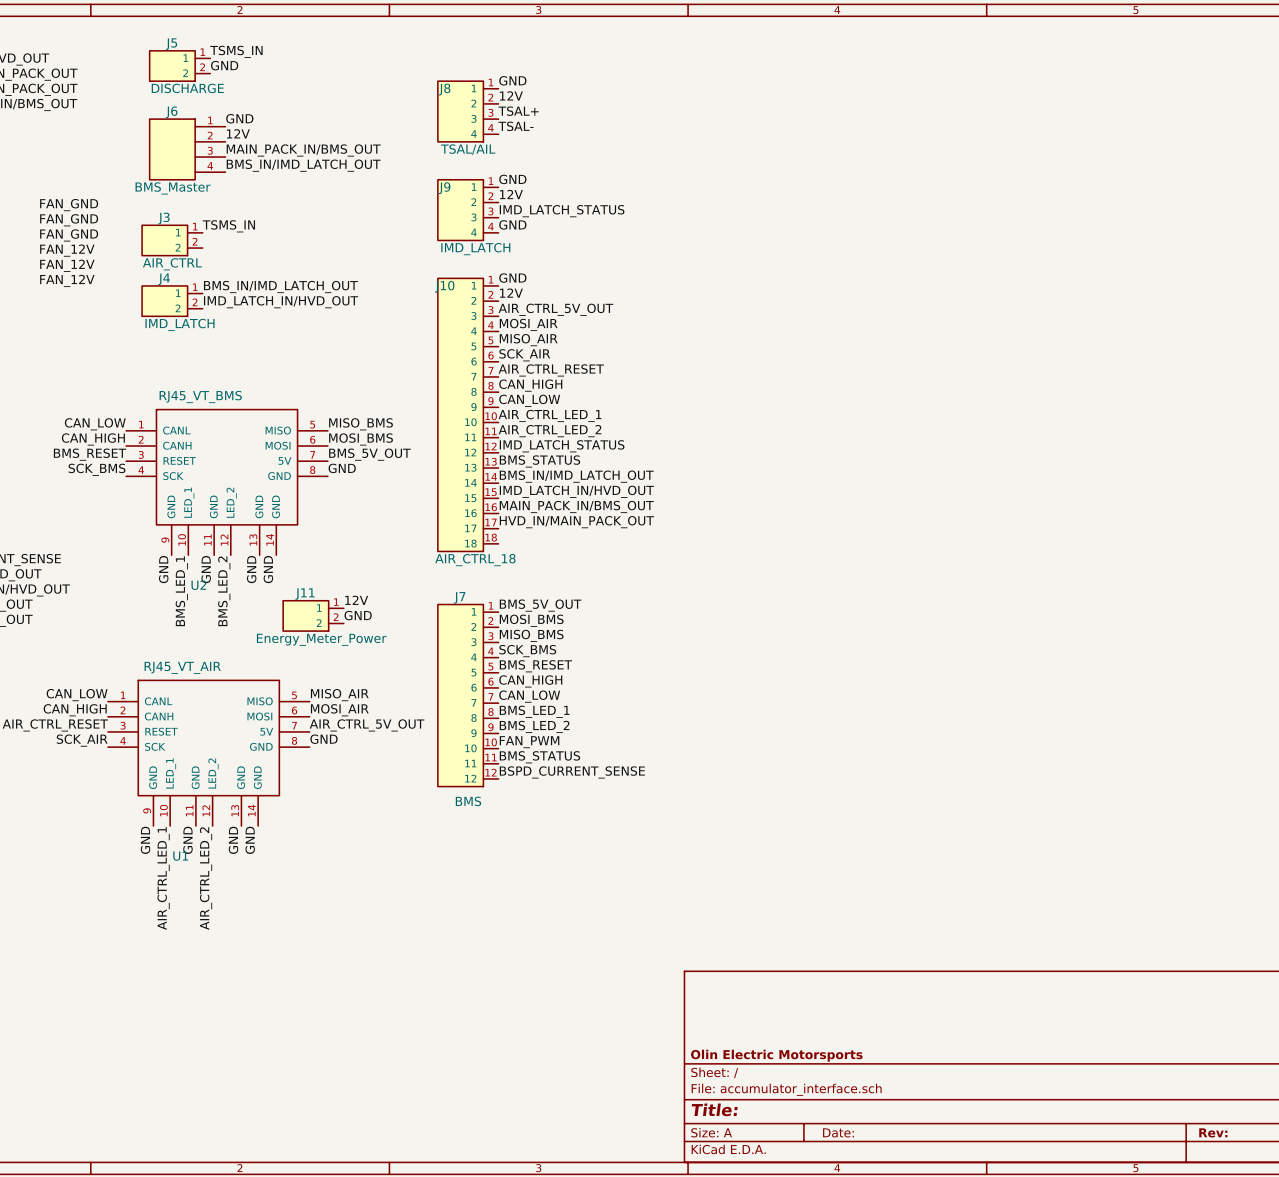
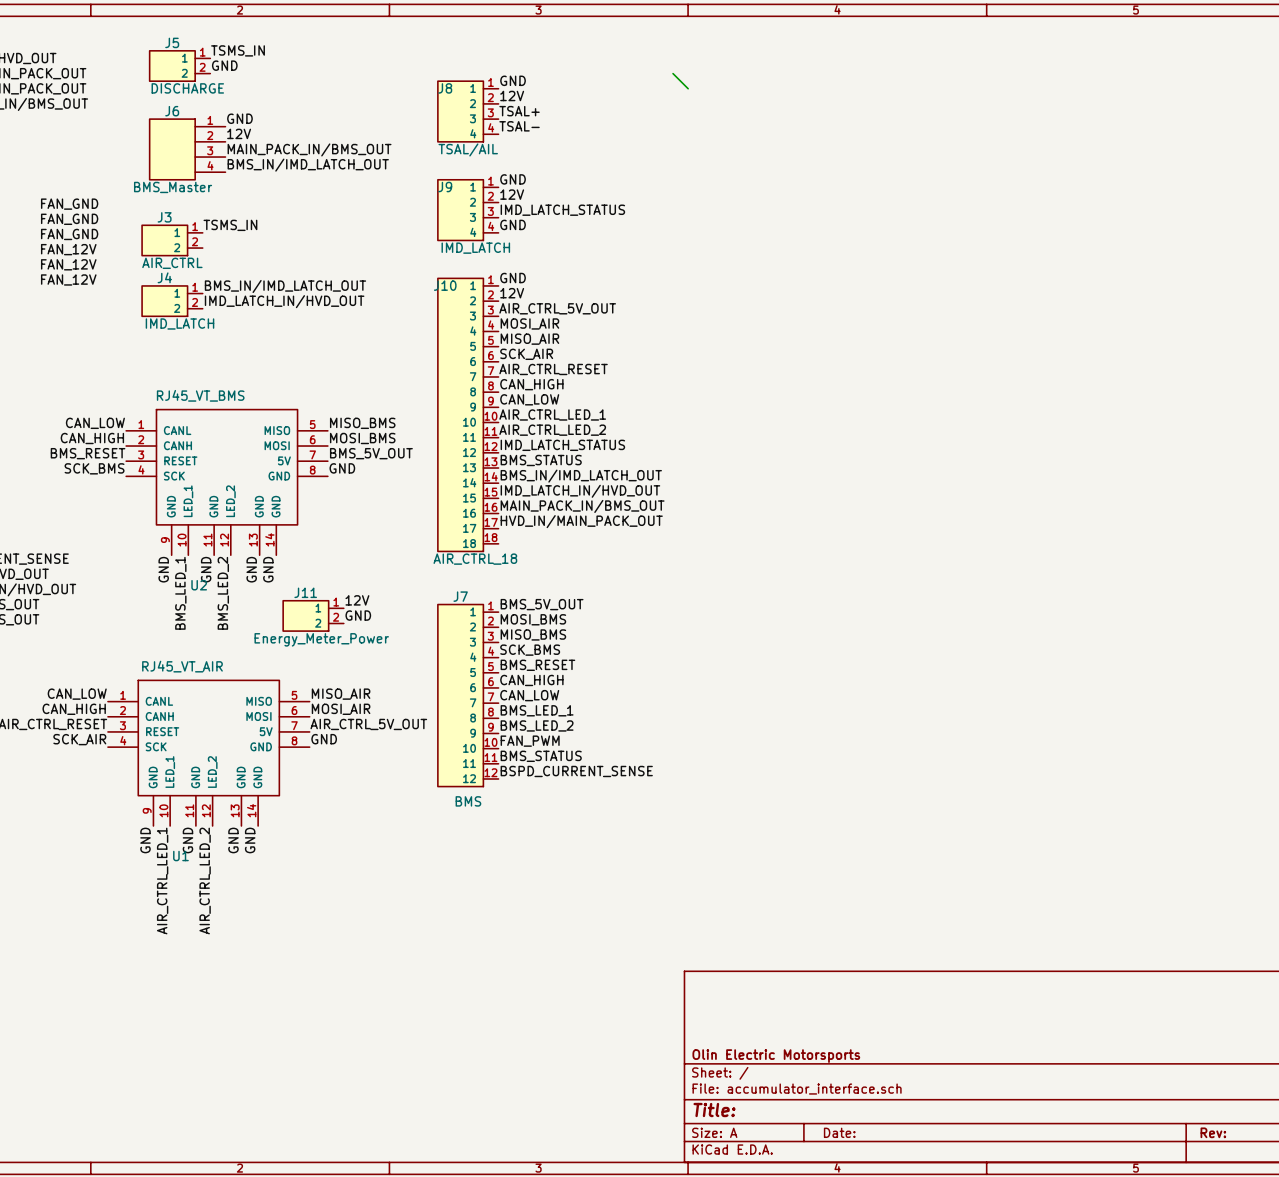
wire: none -> (673, 73) (688, 88)

